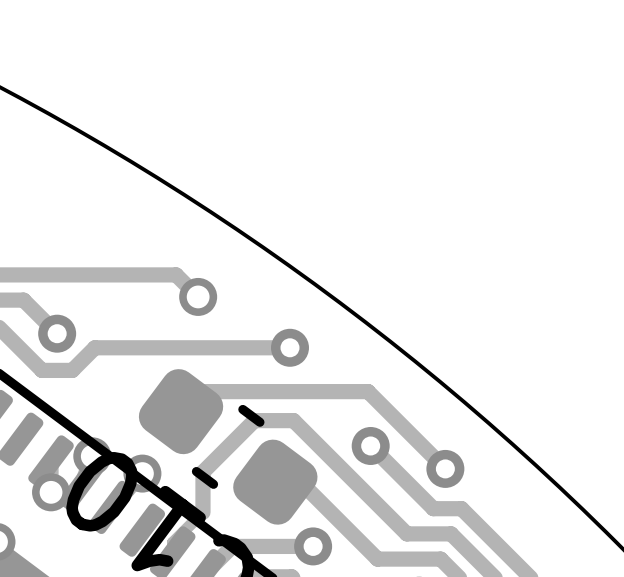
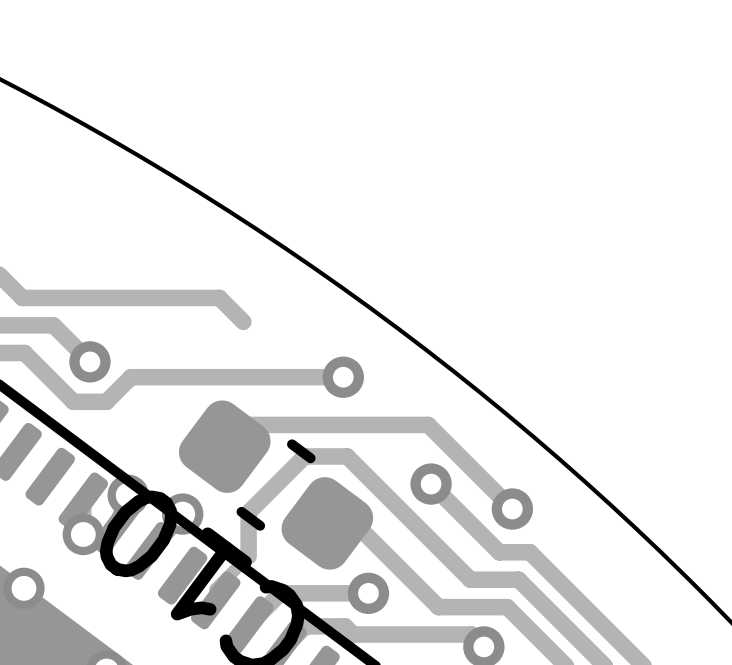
via: (198, 296) -> none

